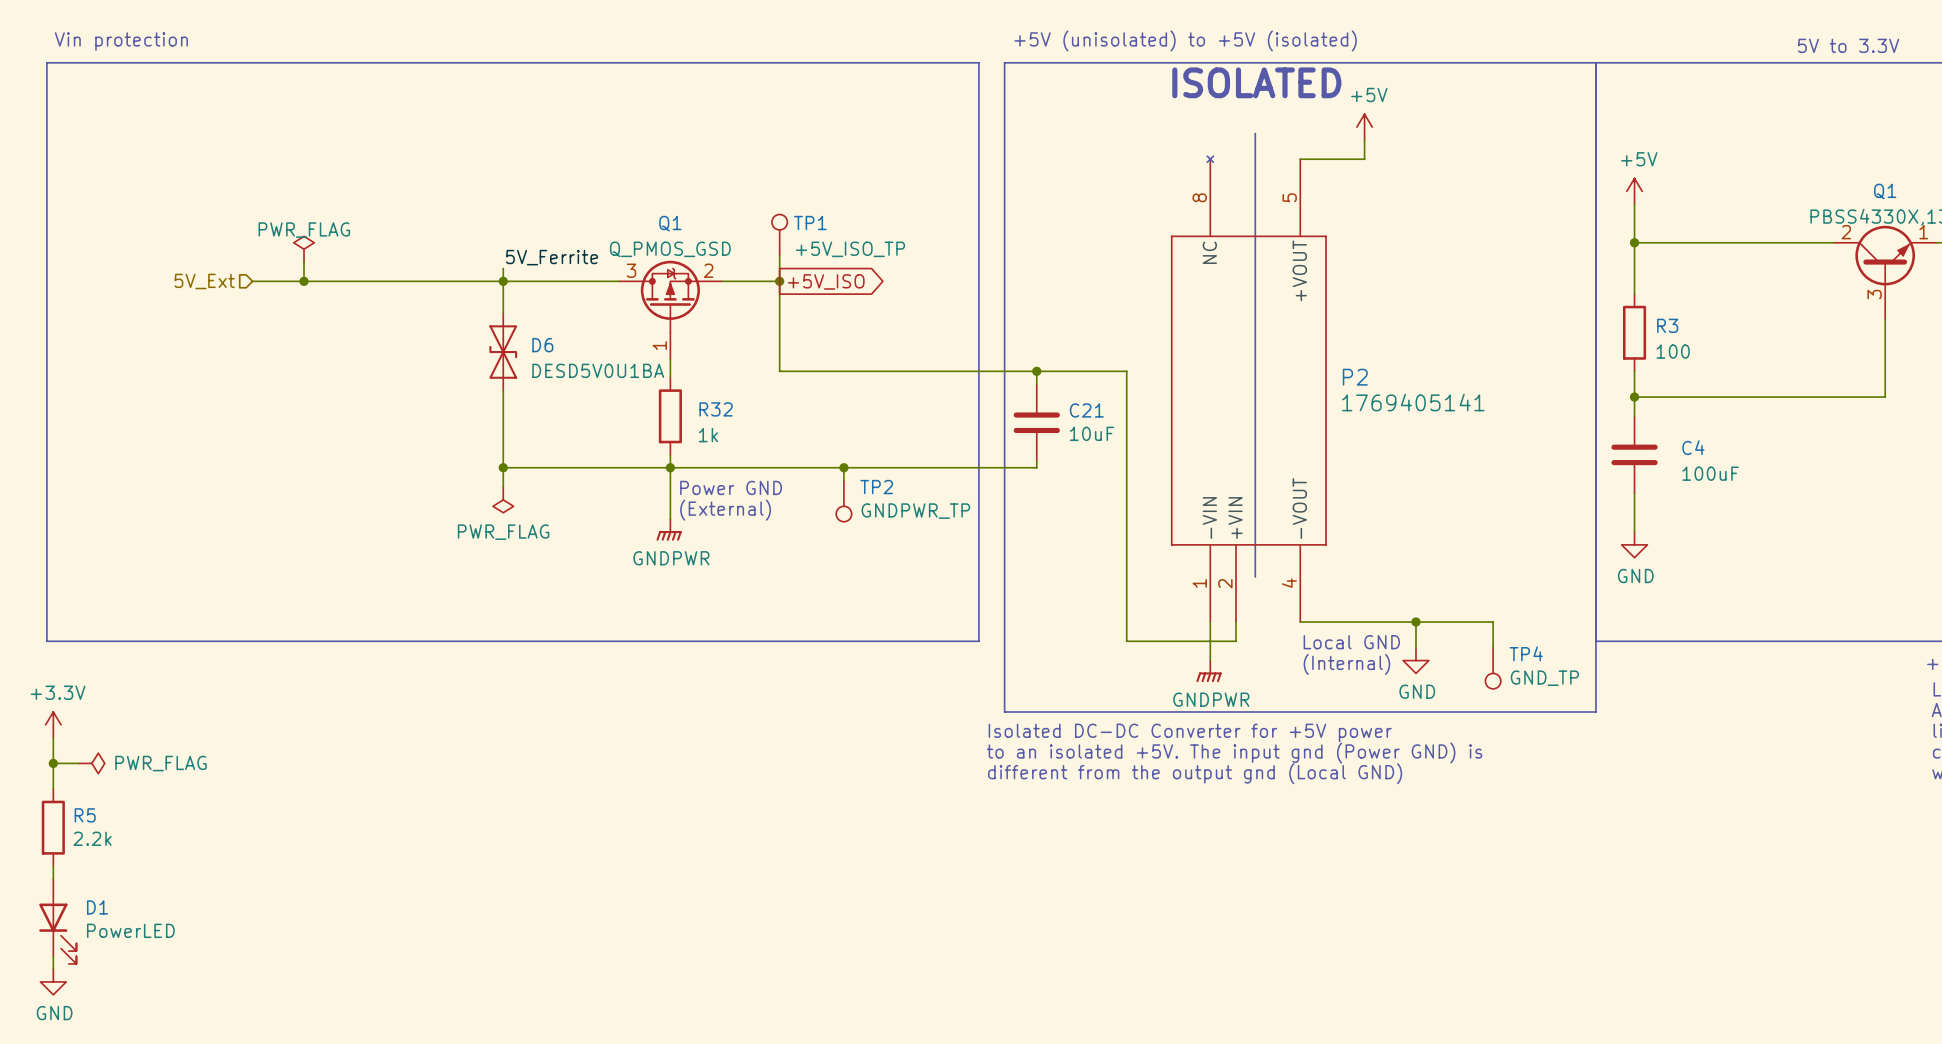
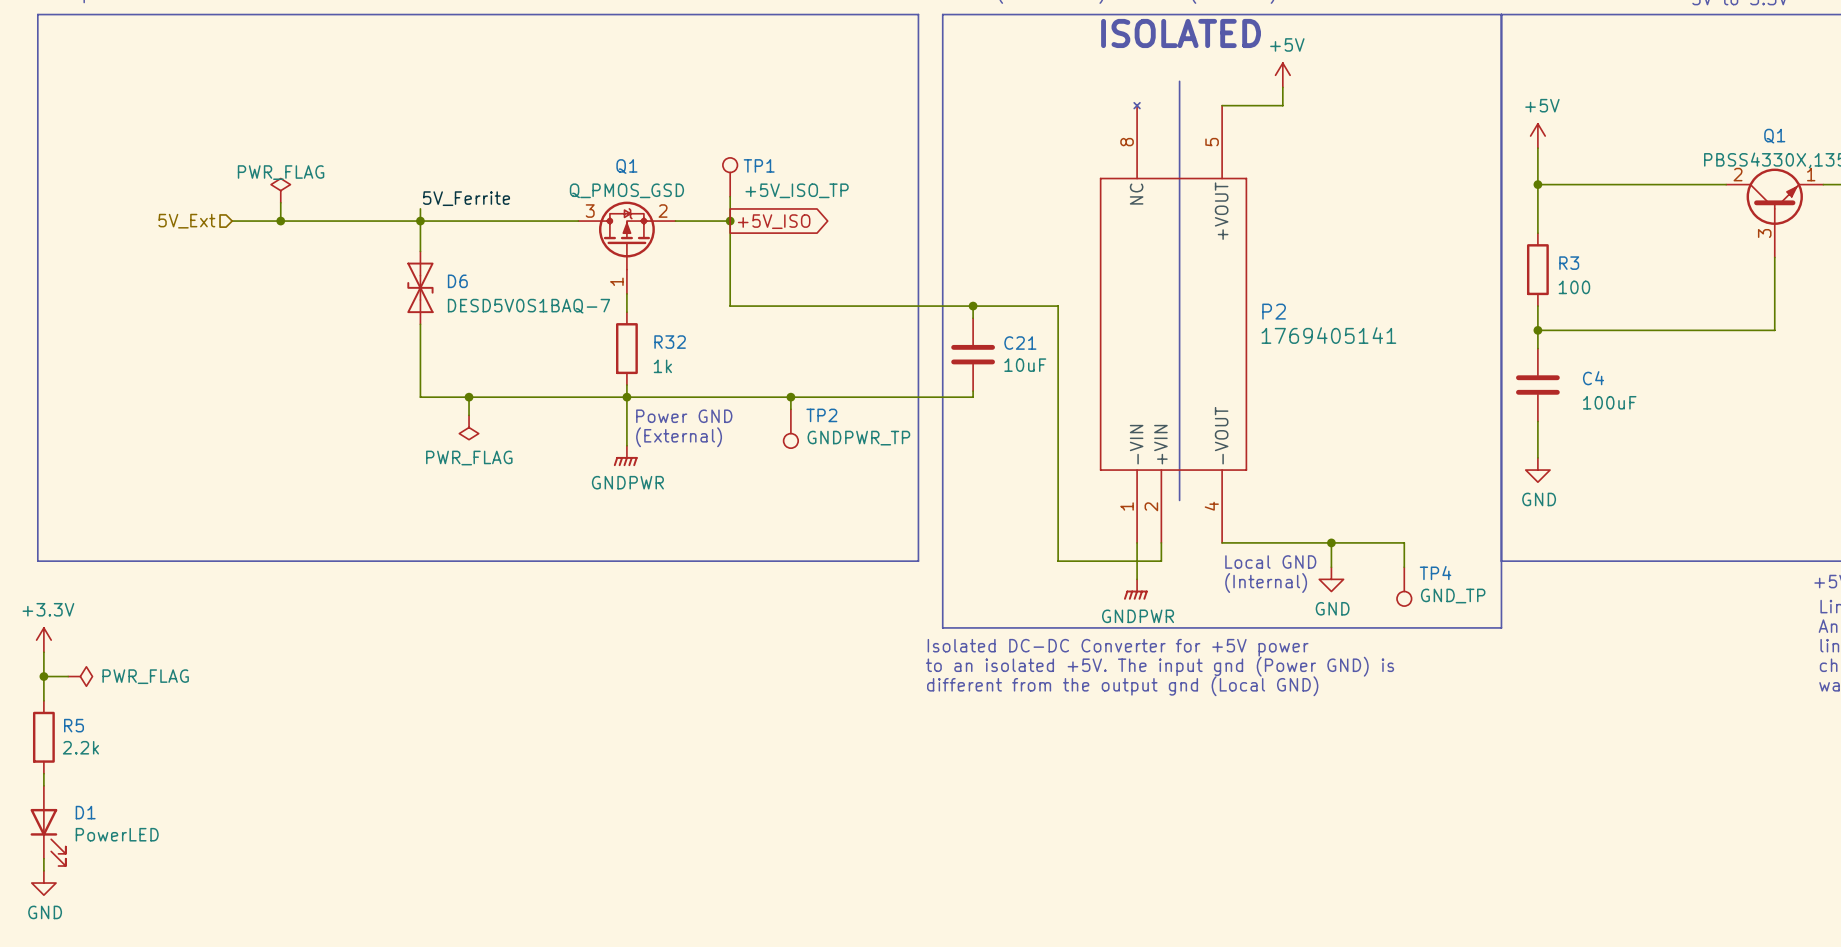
label position: 5V_Ferrite (552, 257) -> 5V_Ferrite (466, 198)
wire: (503, 268) (503, 313) -> (420, 208) (420, 251)
junction position: (503, 281) -> (420, 221)
D6 position: (503, 352) -> (420, 287)
D6 value: DESD5V0U1BA (598, 370) -> DESD5V0S1BAQ-7 (528, 306)
wire: (503, 390) (503, 467) -> (420, 324) (420, 397) (469, 397)

